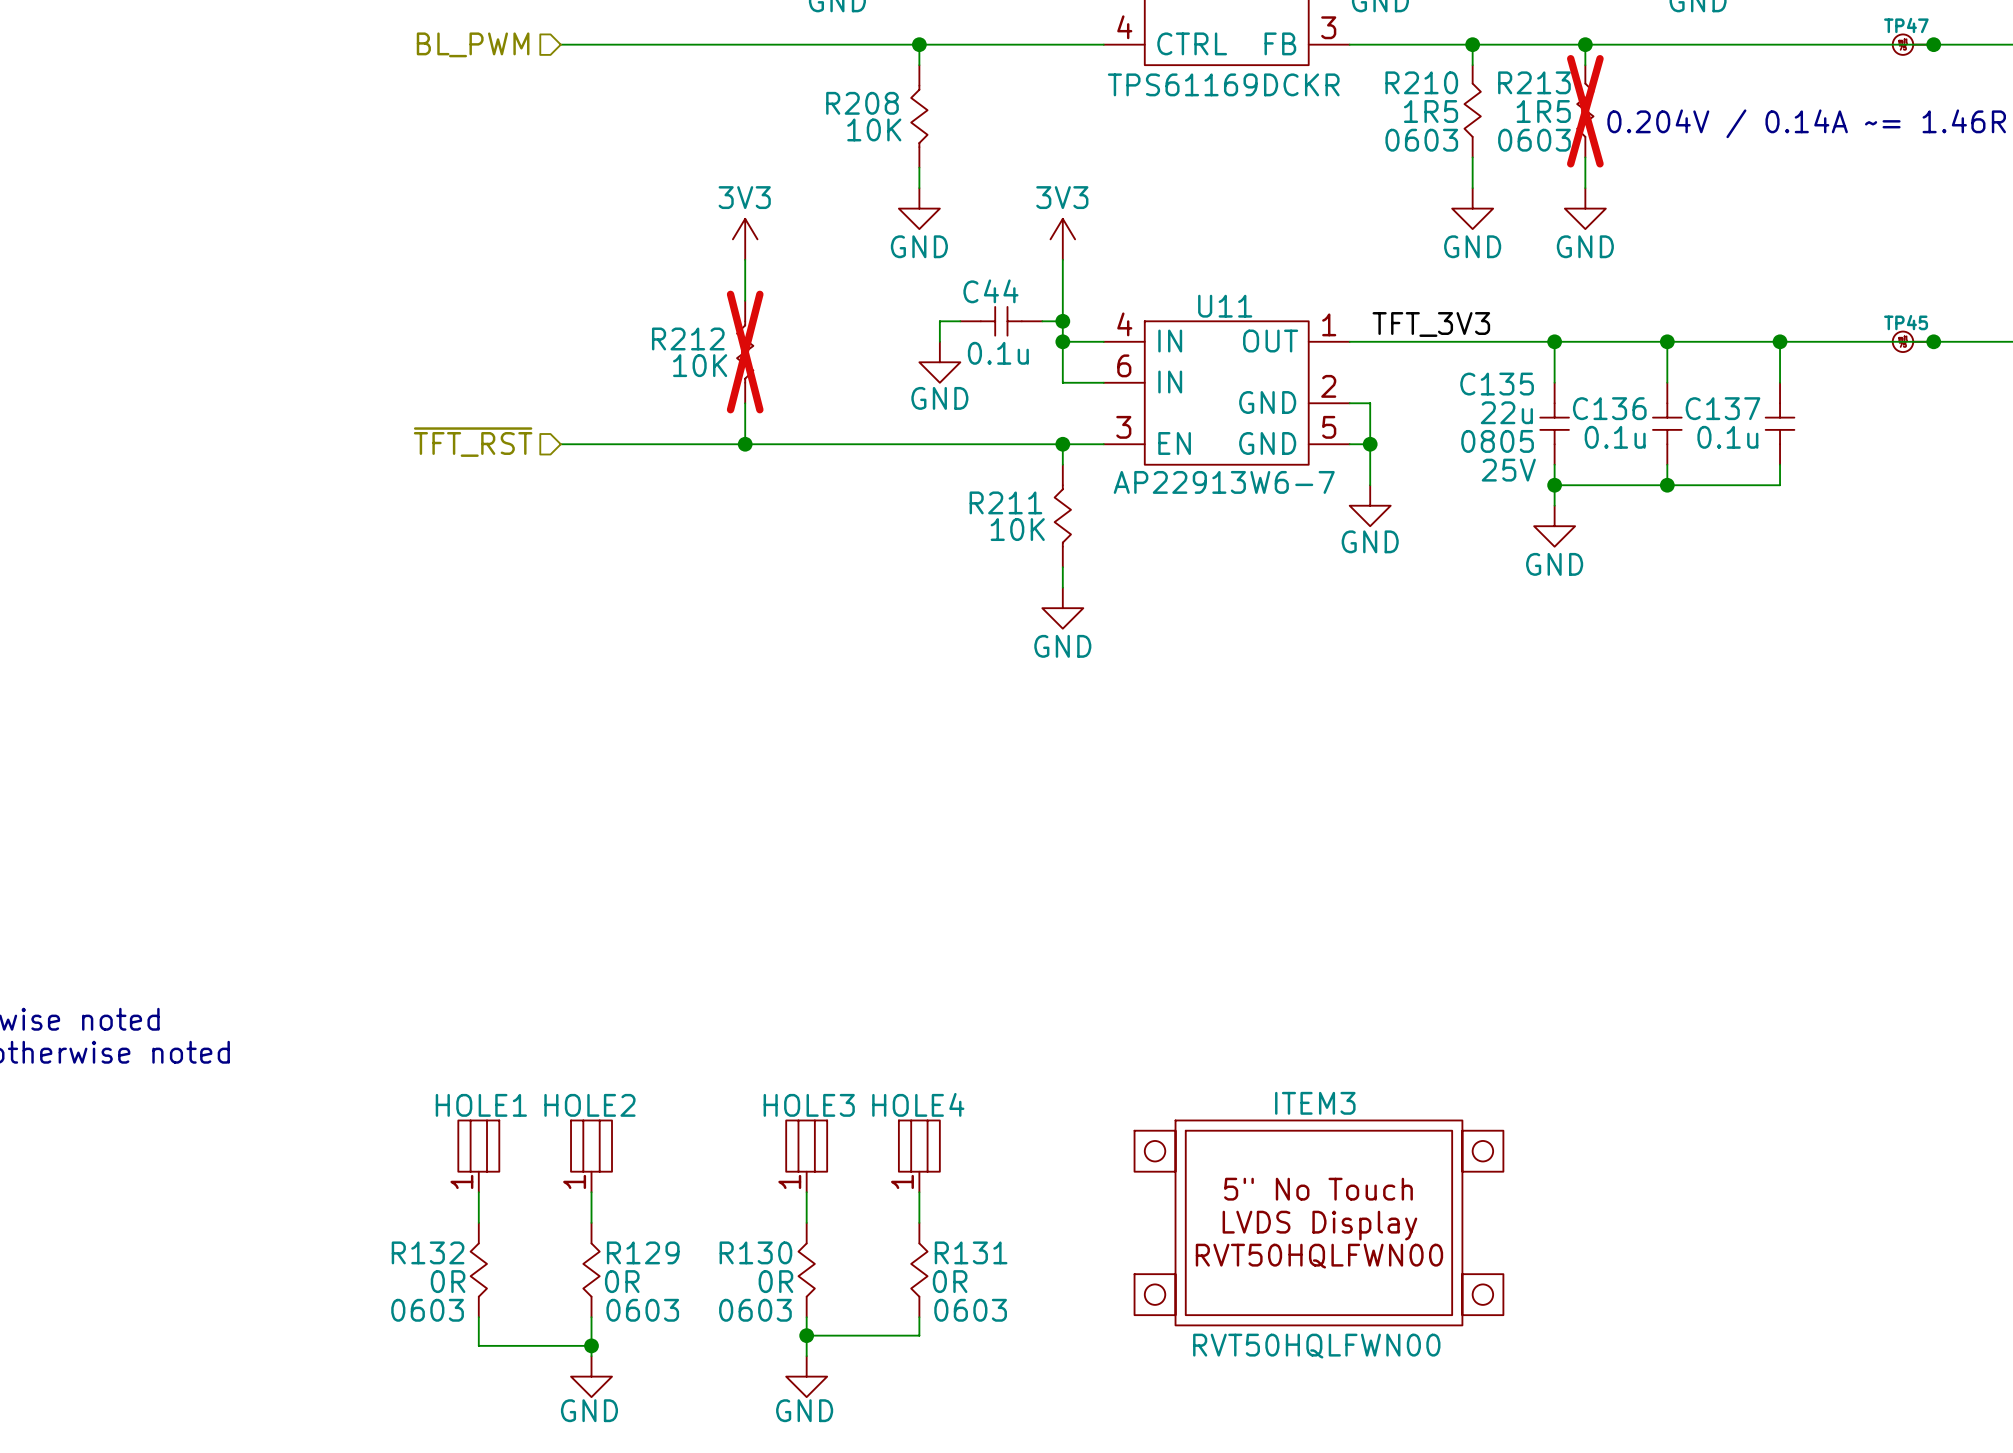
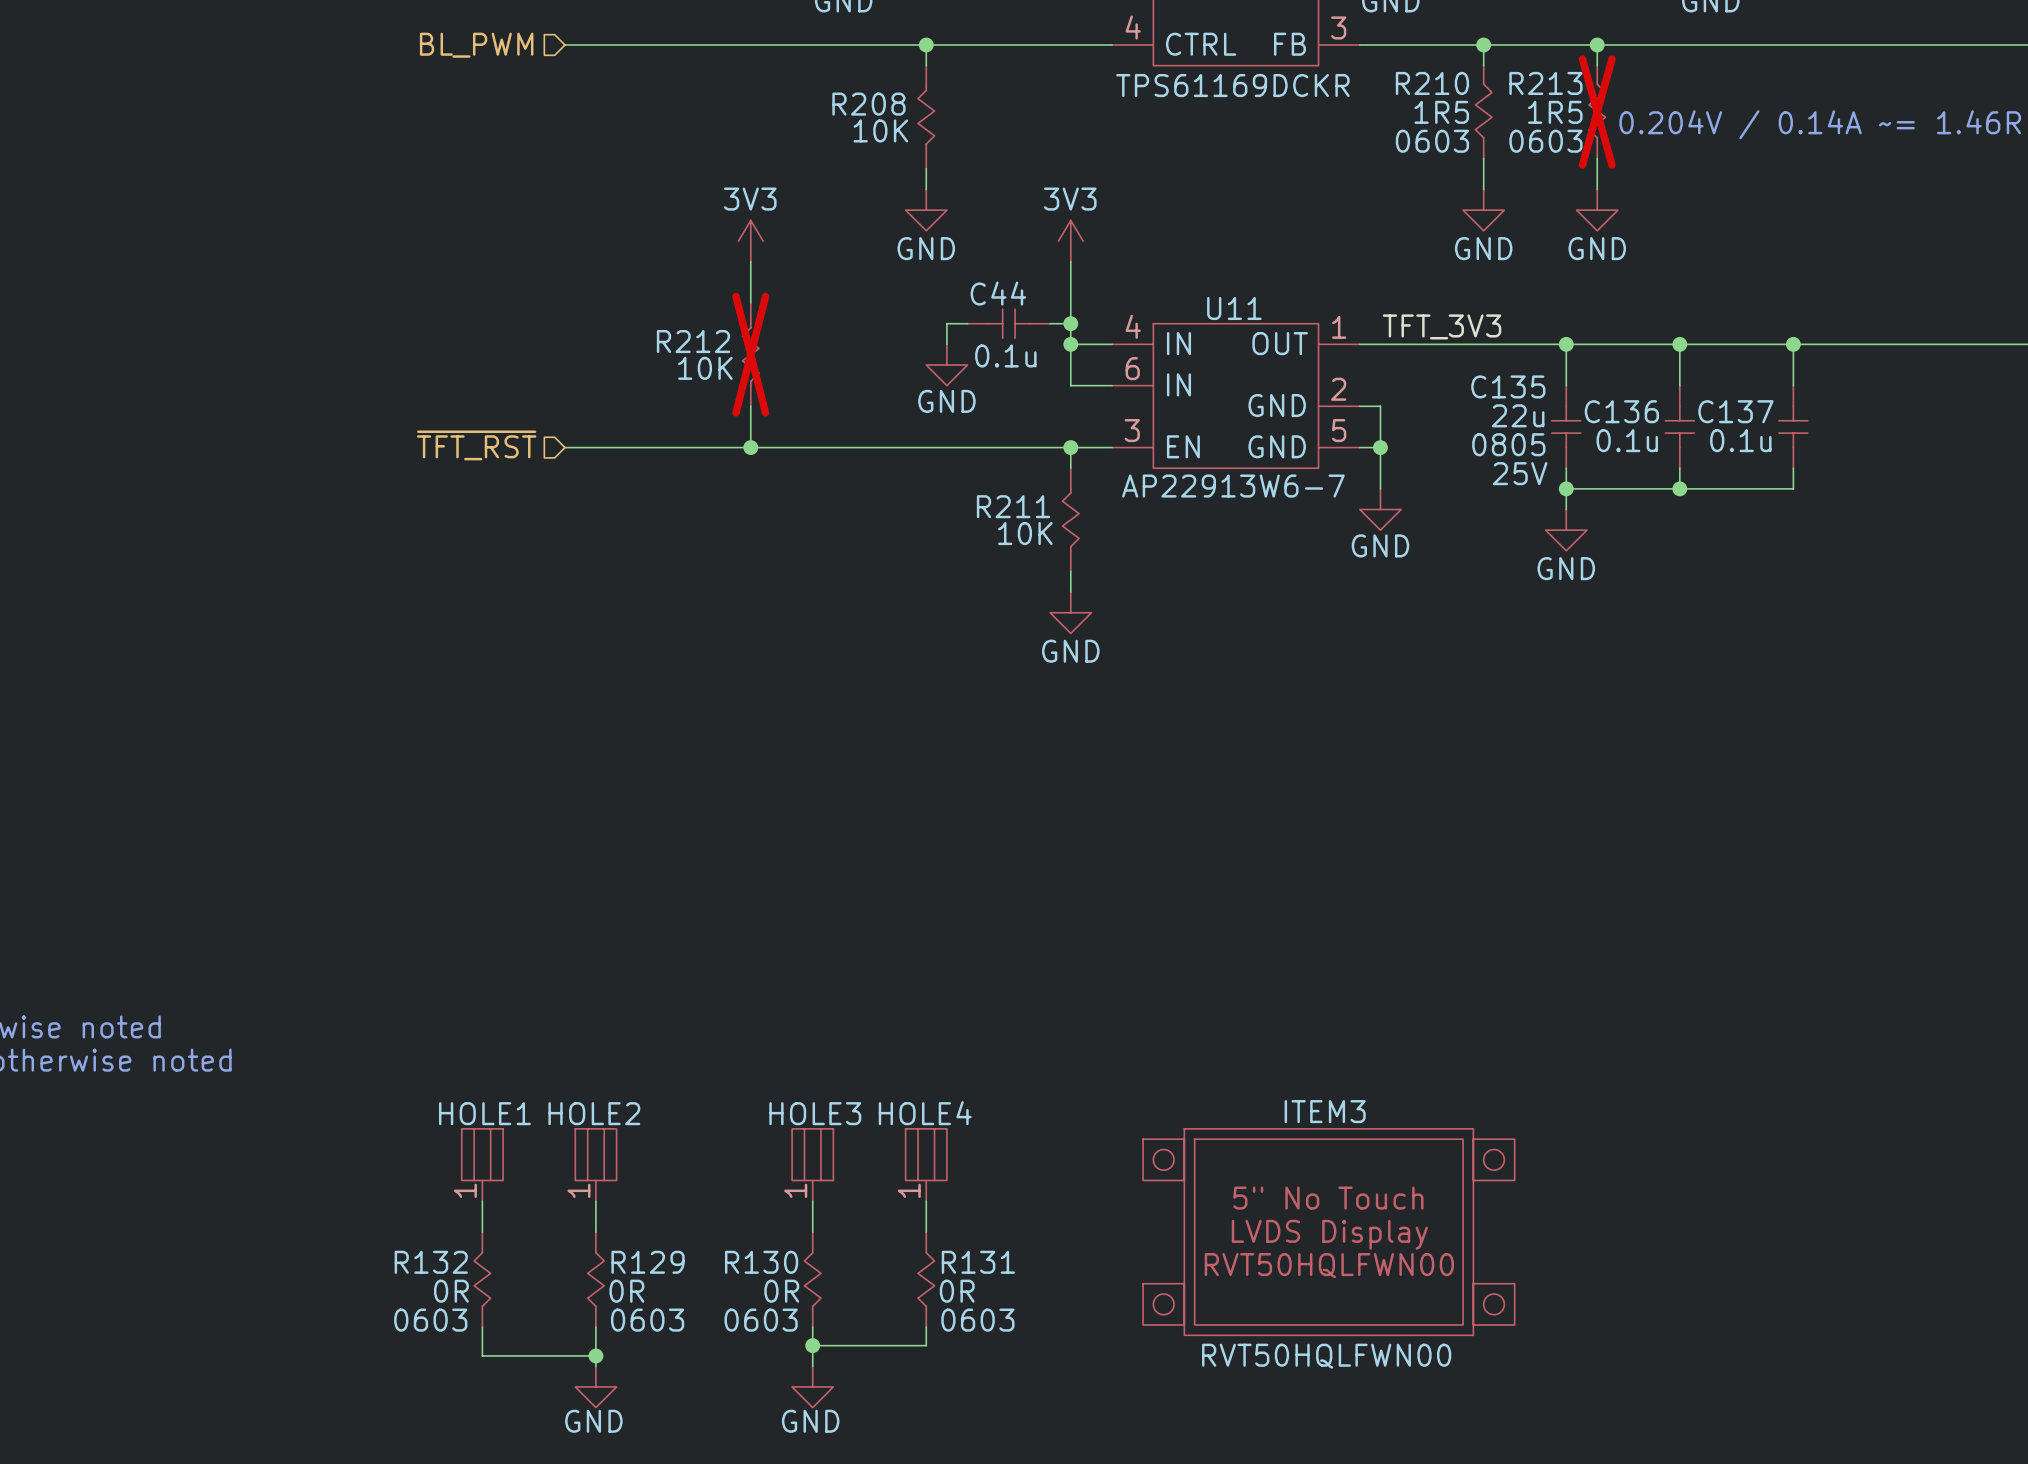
TP47: (1913, 44) -> none
junction: (1933, 44) -> none
TP45: (1913, 341) -> none
junction: (1933, 341) -> none

